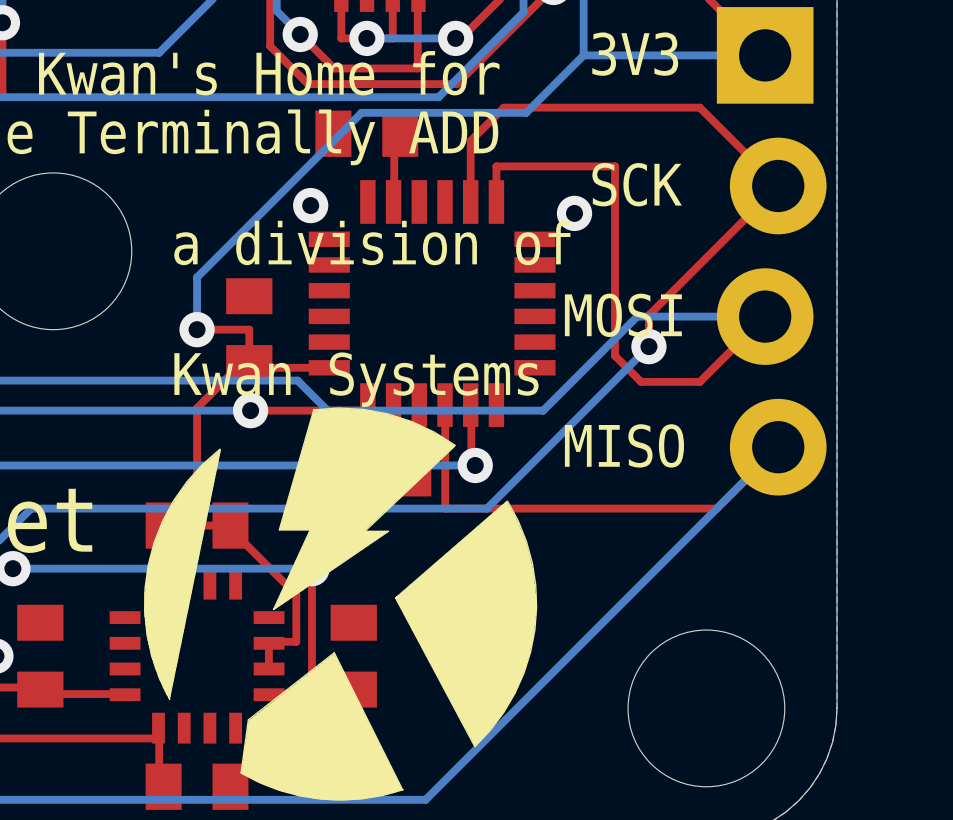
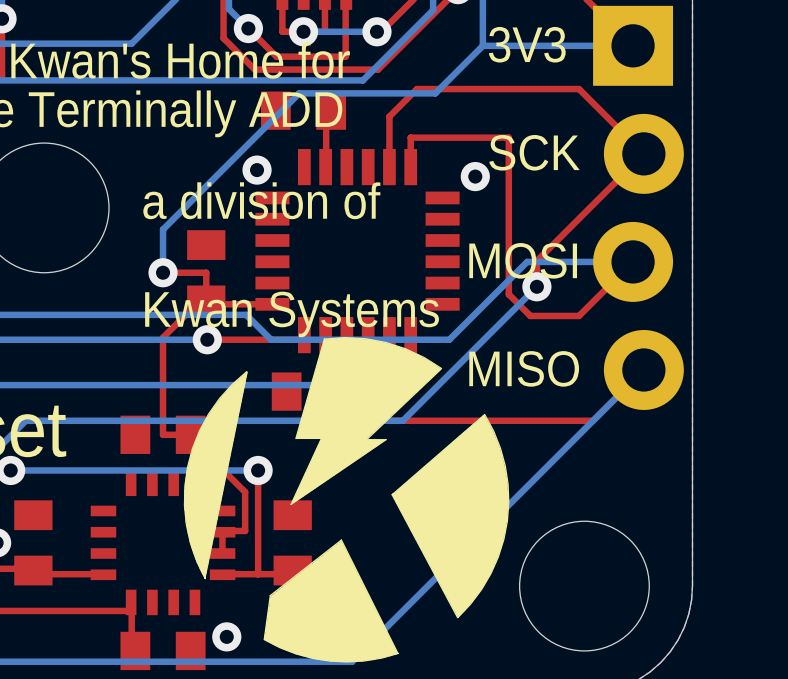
drawing position: (340, 604) -> (346, 499)

